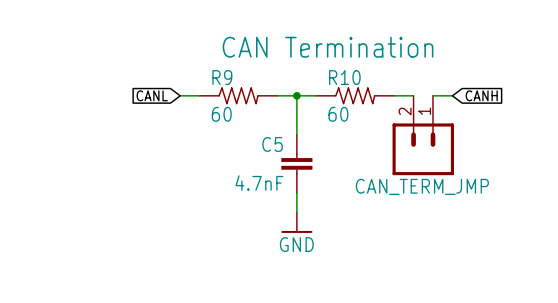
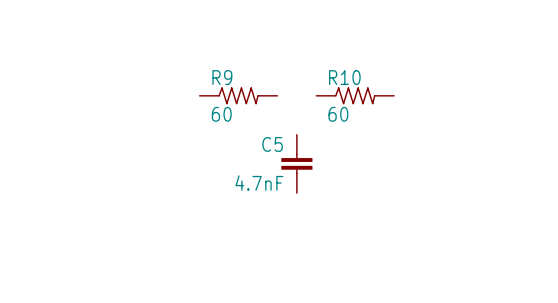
text: CAN Termination (328, 47) -> none
global label: CANL (152, 95) -> none
wire: (180, 95) (199, 95) -> none
wire: (277, 95) (316, 95) -> none
wire: (296, 95) (296, 134) -> none
junction: (296, 95) -> none
wire: (394, 95) (413, 95) -> none
wire: (433, 95) (452, 95) -> none
global label: CANH (481, 95) -> none
CAN_TERM_JMP: (423, 135) -> none
wire: (296, 193) (296, 212) -> none
power symbol: GND (296, 222) -> none

